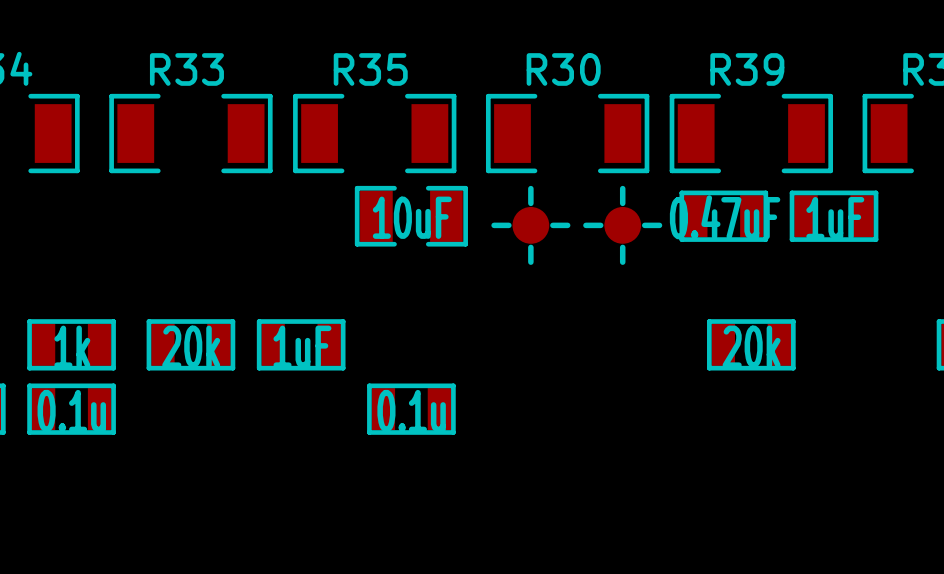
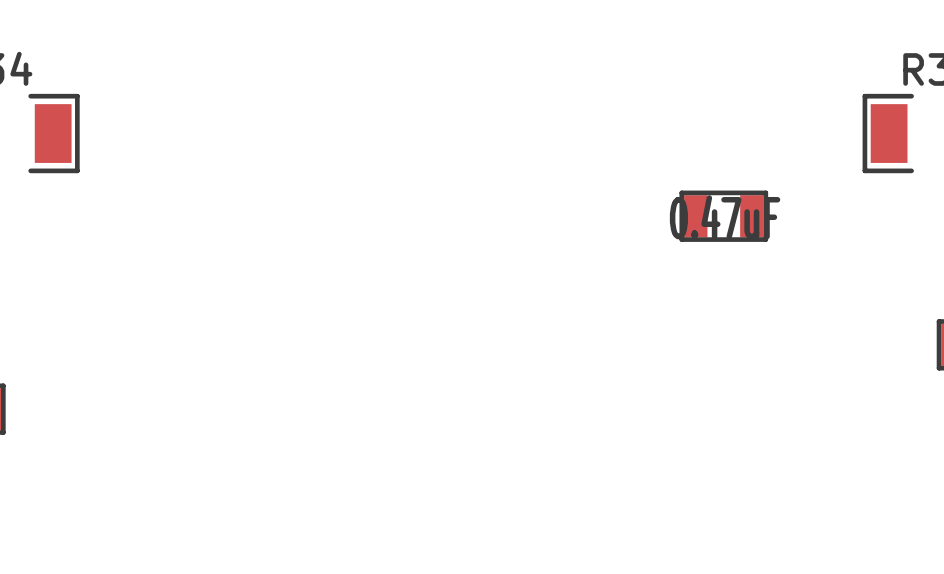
R33: (190, 133) -> none
R35: (374, 133) -> none
R30: (567, 133) -> none
R39: (751, 133) -> none
part: 10uF (411, 216) -> none
part: 1uF (834, 216) -> none
part: (530, 225) -> none
part: (622, 225) -> none
part: 1k (71, 344) -> none
part: 20k (190, 344) -> none
part: 1uF (301, 344) -> none
part: 20k (751, 344) -> none
part: 0.1u (71, 409) -> none
part: 0.1u (411, 409) -> none

